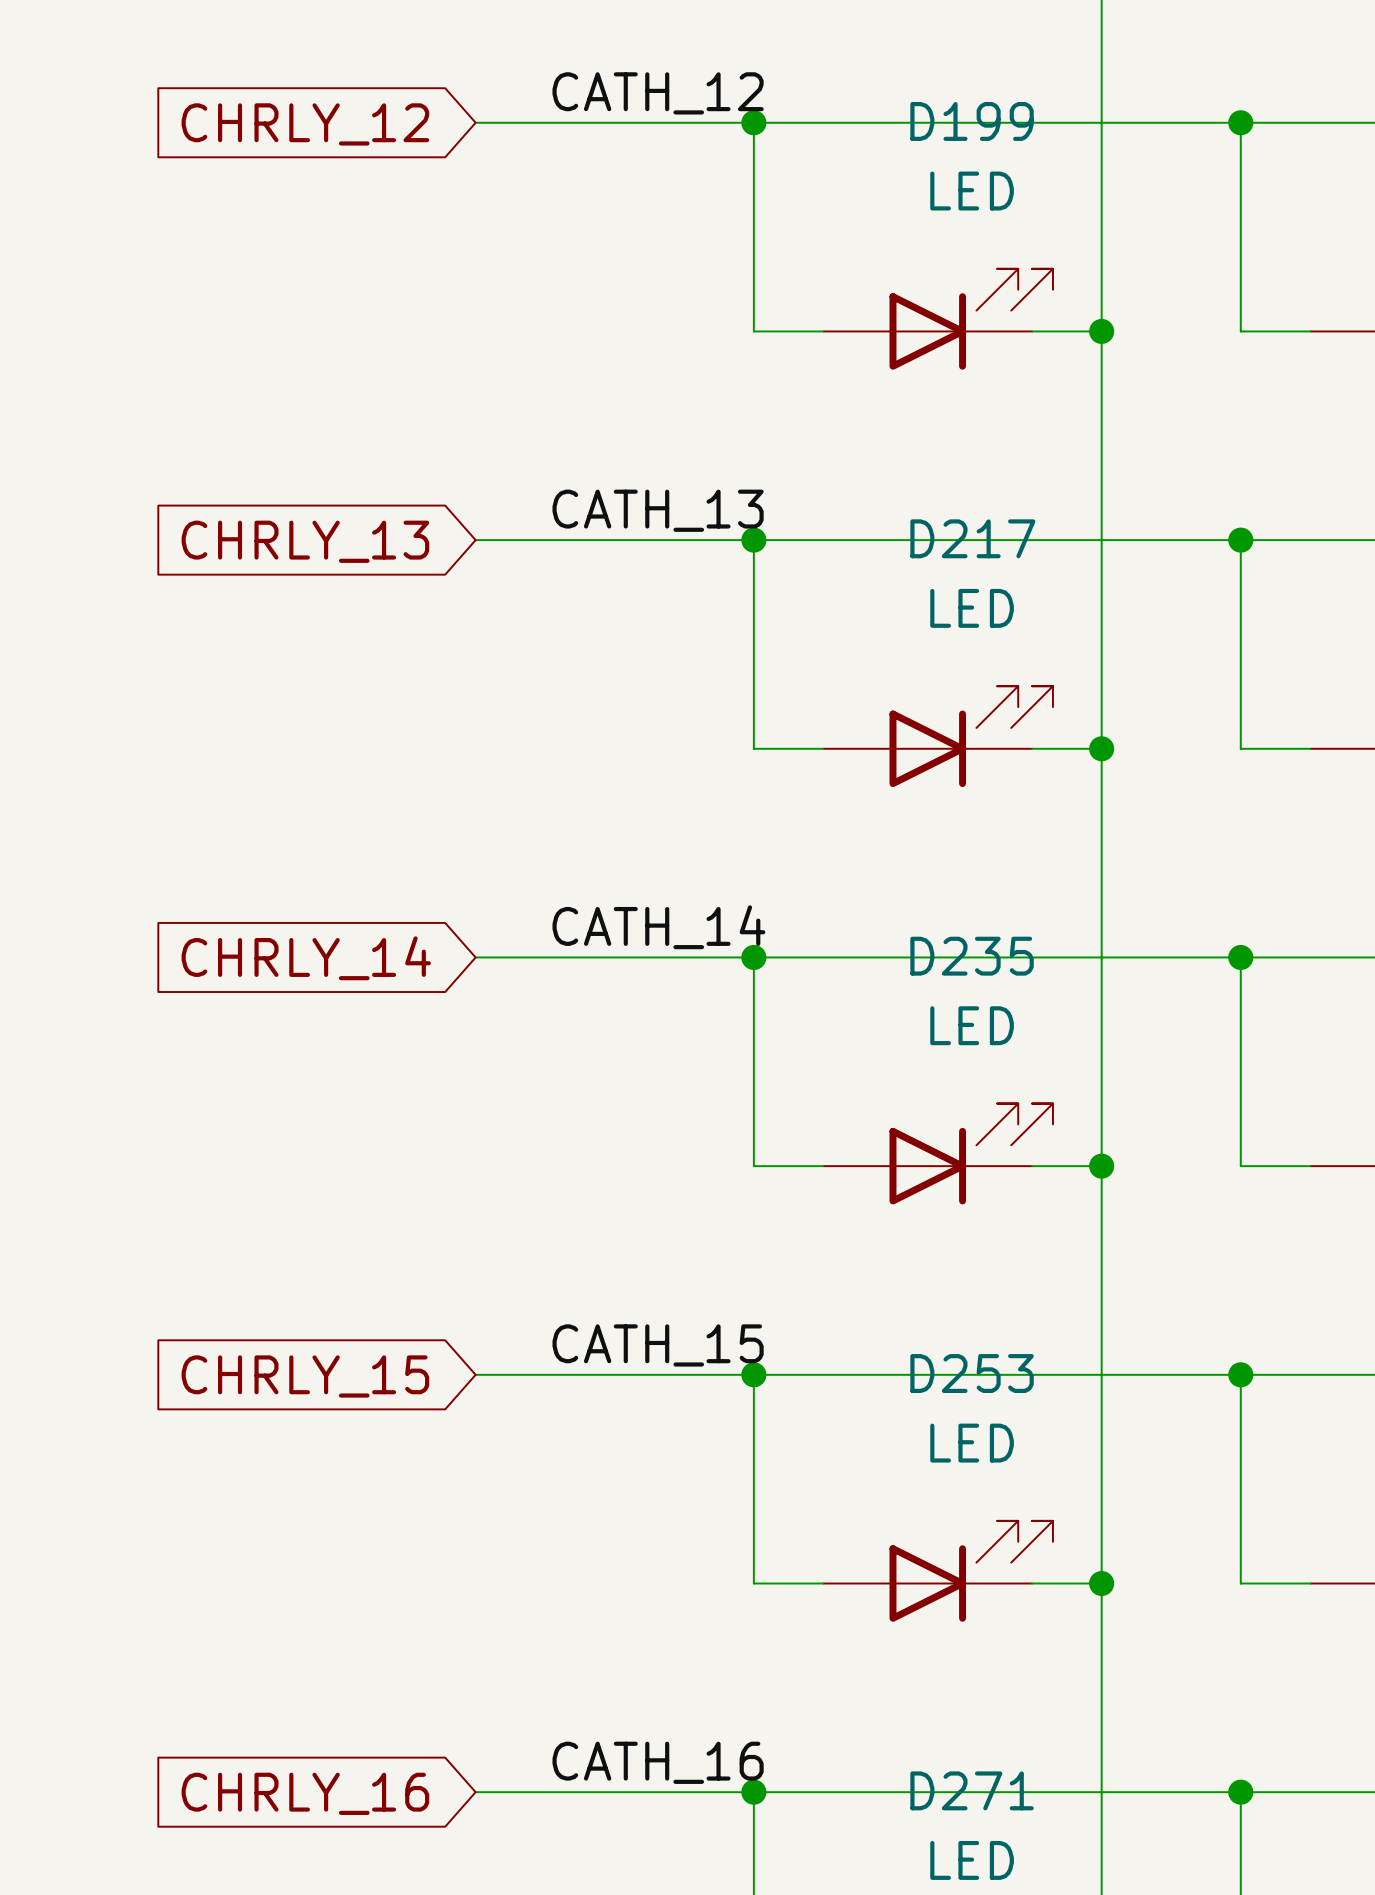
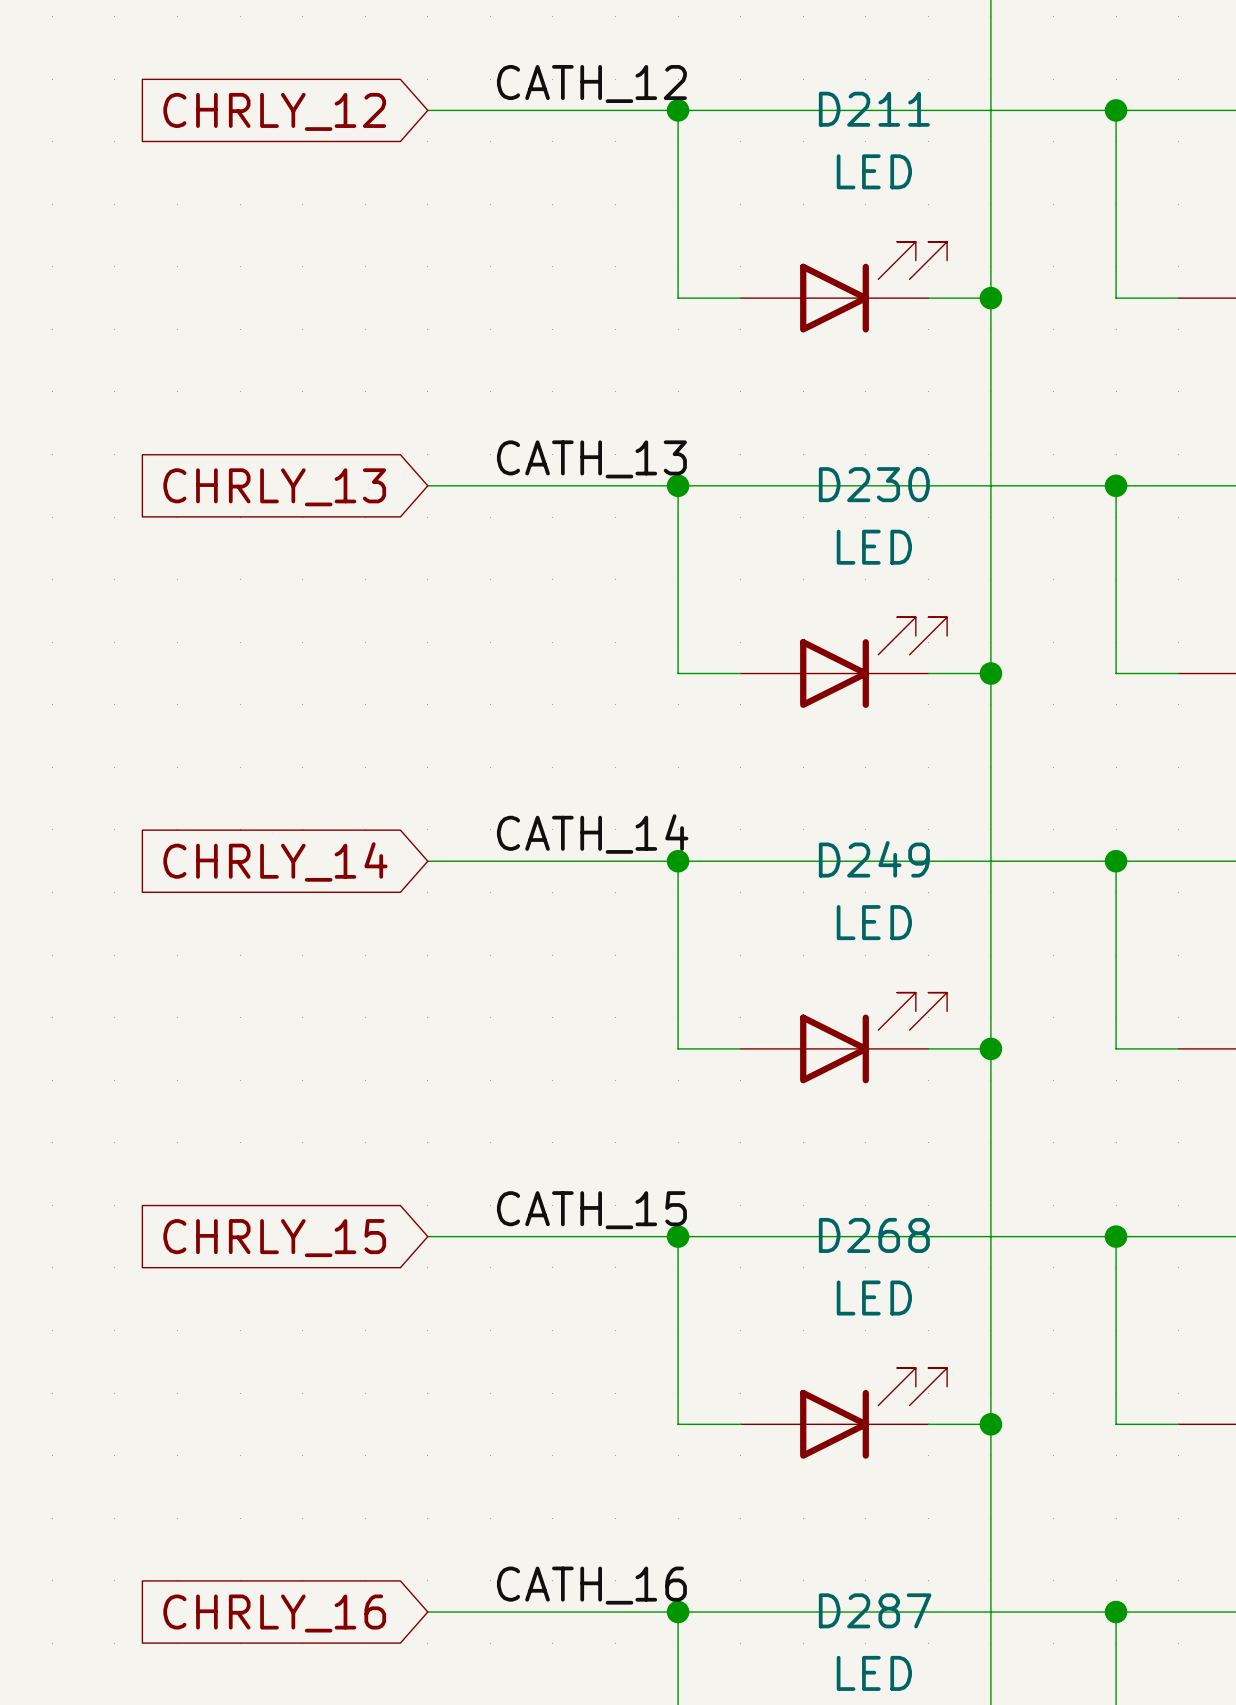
D199 name: D199 (972, 121) -> D211 (874, 109)
D217 name: D217 (972, 538) -> D230 (874, 484)
D235 name: D235 (972, 956) -> D249 (874, 859)
D253 name: D253 (972, 1373) -> D268 (874, 1235)
D271 name: D271 (972, 1790) -> D287 (875, 1610)

